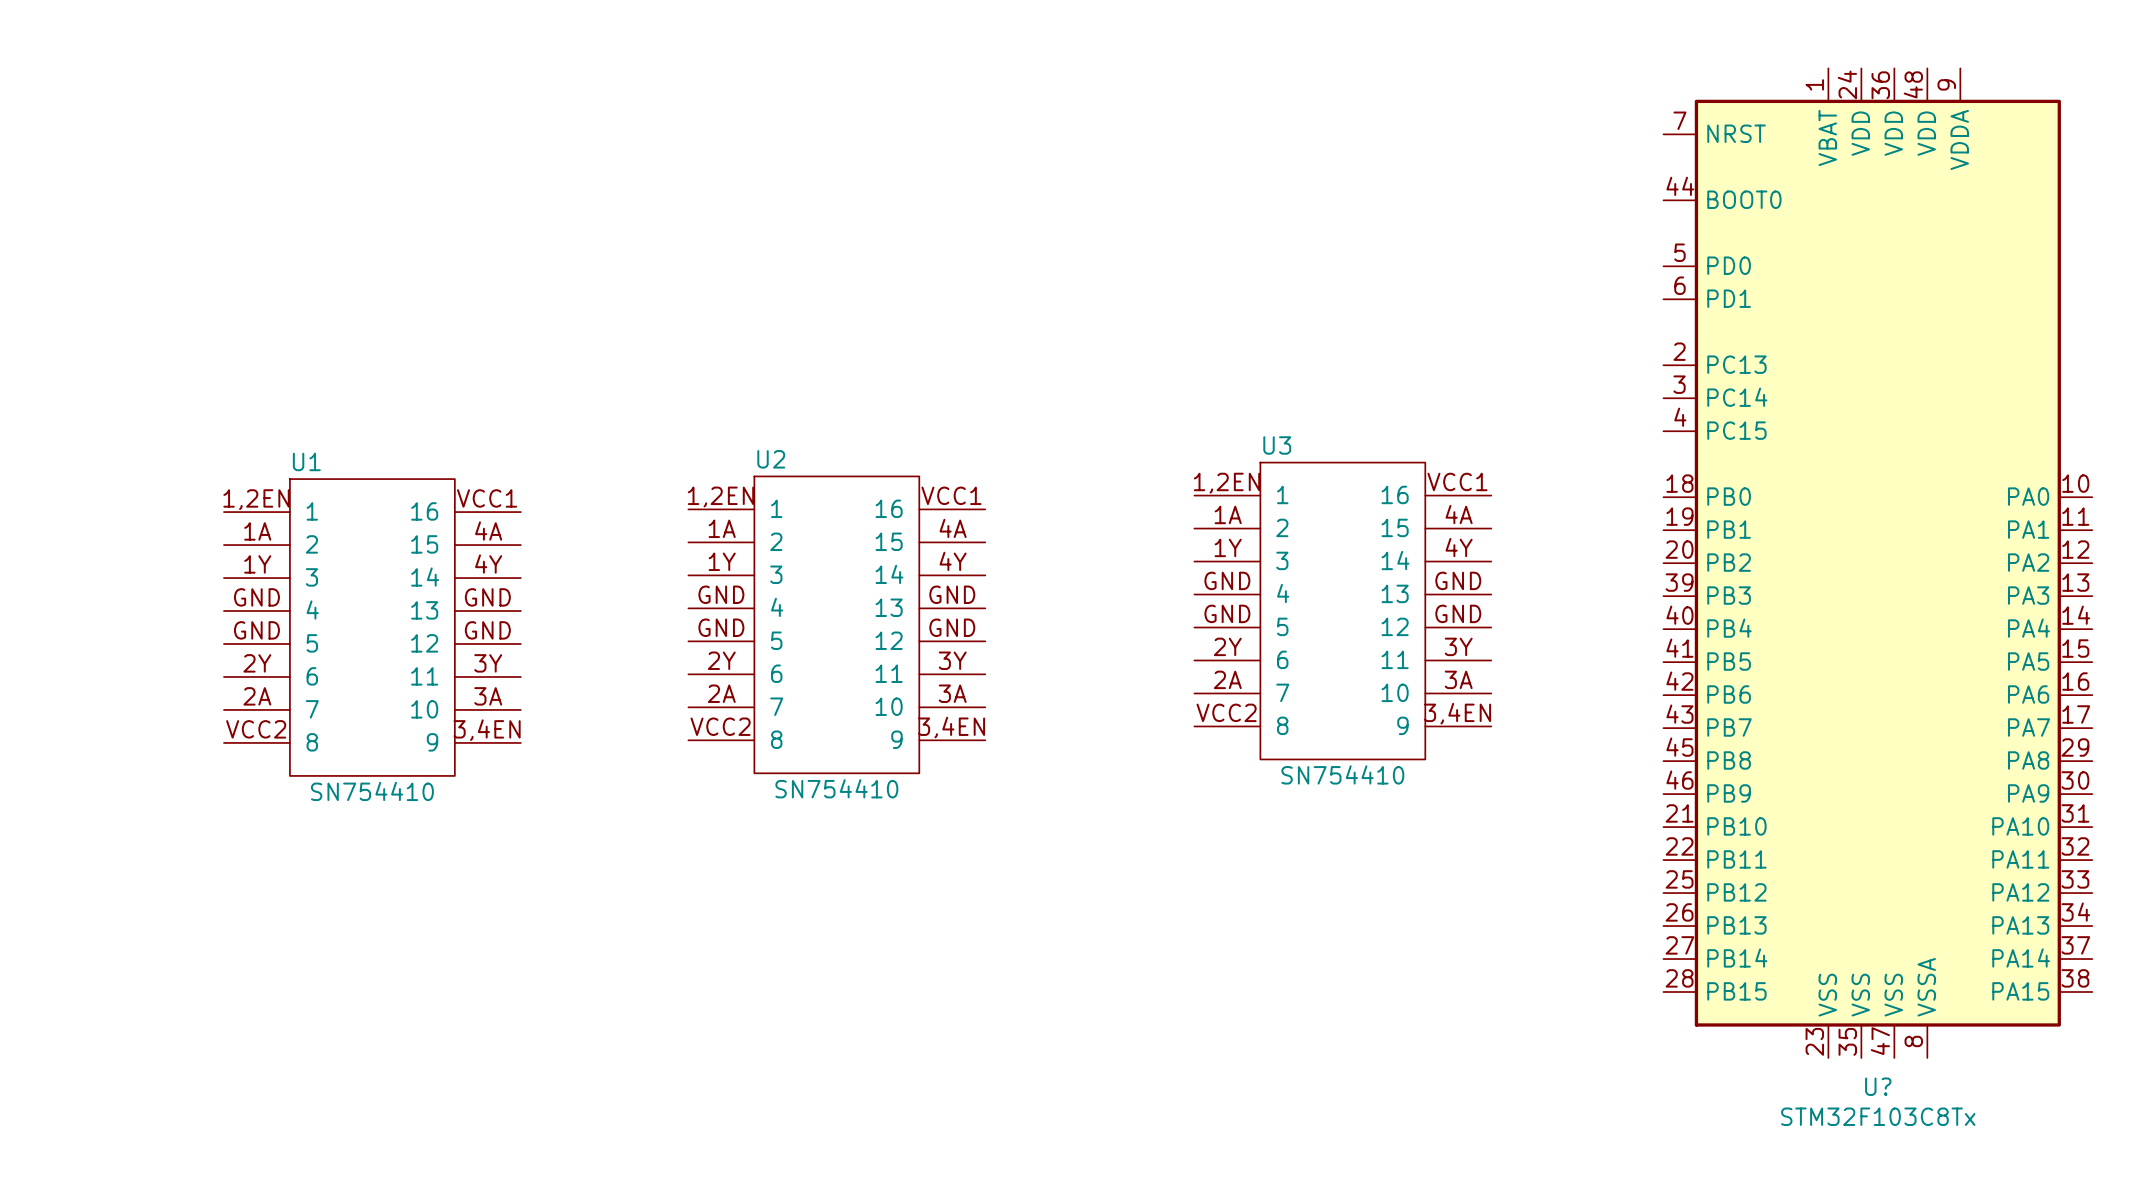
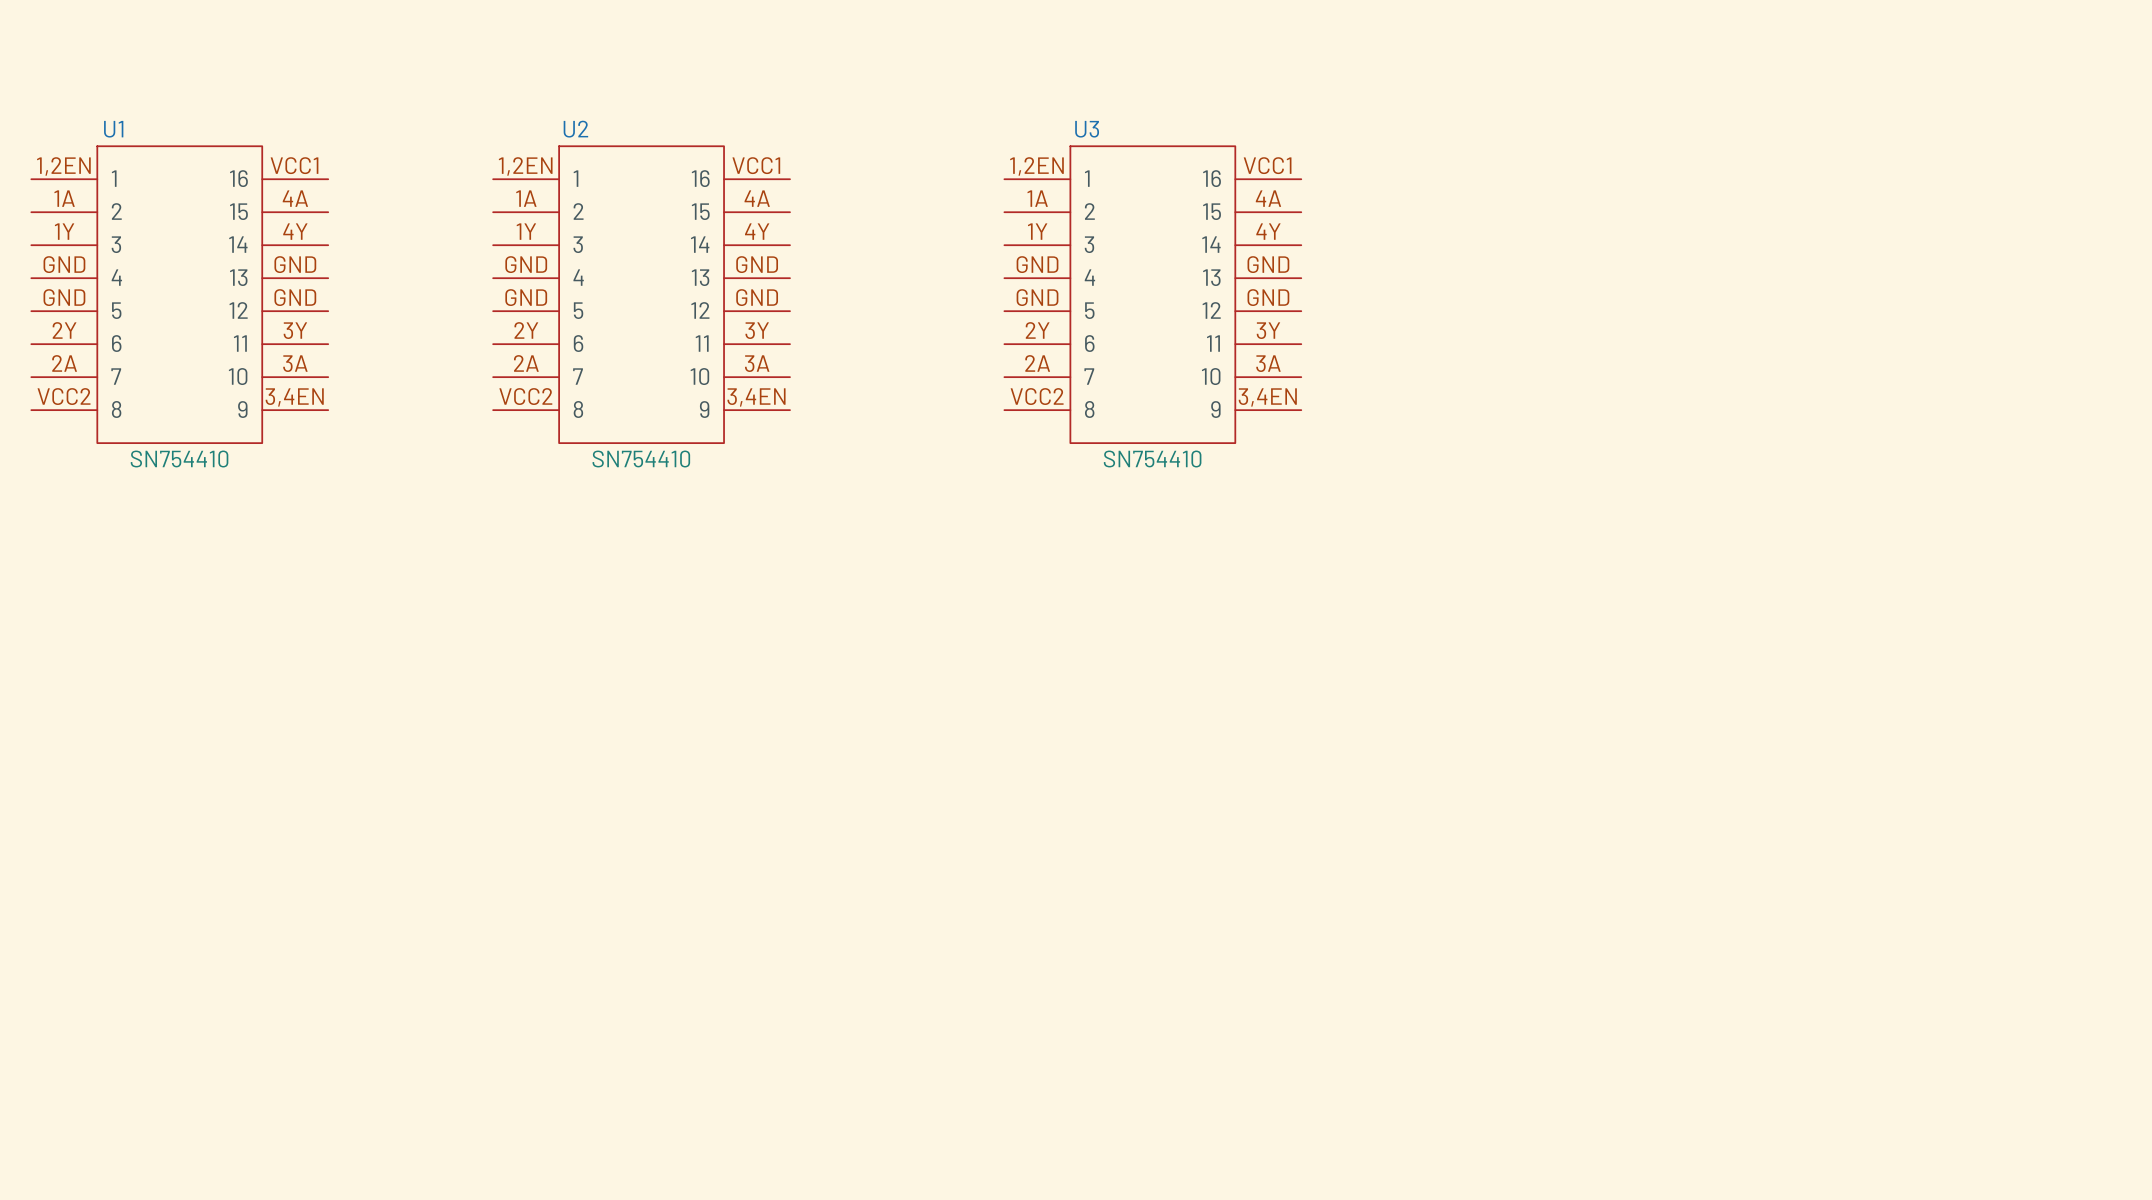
U3 symbol: [1194, 462, 1492, 760] -> [1004, 129, 1302, 444]
U2 symbol: [688, 476, 986, 774] -> [493, 129, 791, 444]
U1 symbol: [223, 479, 521, 776] -> [31, 129, 329, 444]
U?: STM32F103C8Tx (1877, 563) -> none

